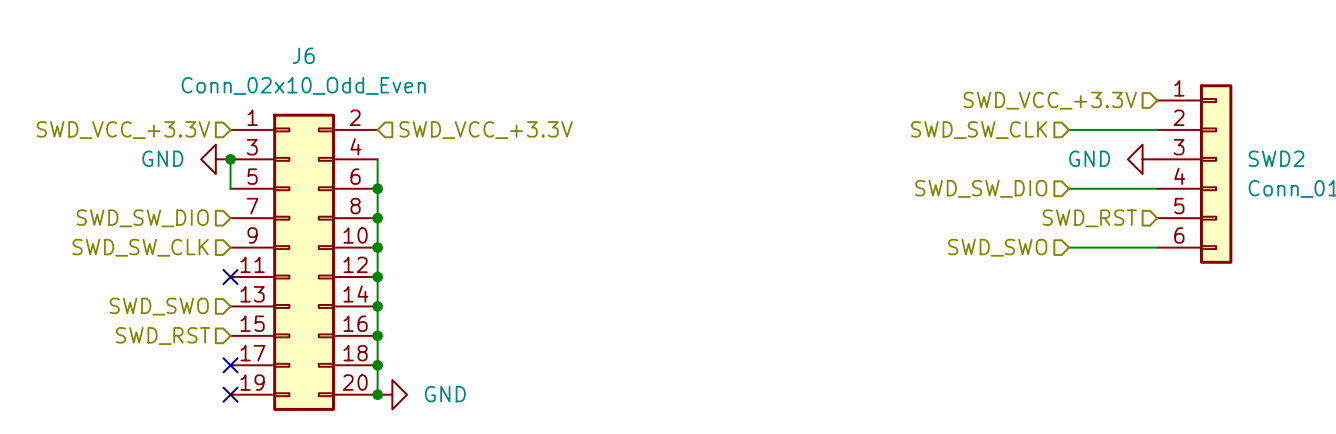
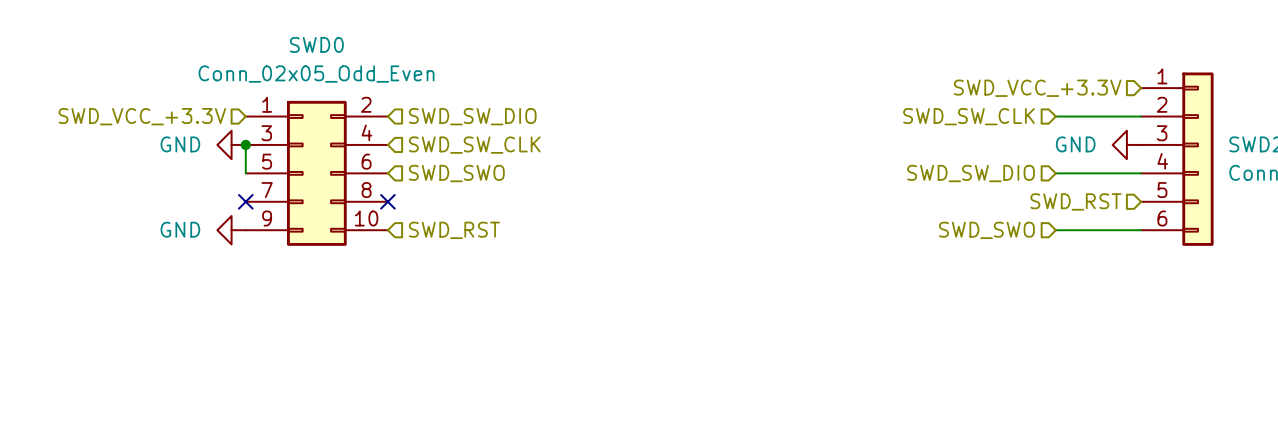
hierarchical label: SWD_VCC_+3.3V (486, 130) -> SWD_SW_DIO (472, 116)
wire: (377, 159) (377, 394) -> none
SWD0: none -> Conn_02x05_Odd_Even (316, 173)
junction: (377, 188) -> none
hierarchical label: SWD_SW_DIO (142, 218) -> none
junction: (377, 218) -> none
no-connect mark: none -> (387, 201)
hierarchical label rotation: 0° (140, 247) -> 180° (474, 145)
hierarchical label position: SWD_SW_CLK (140, 247) -> SWD_SW_CLK (474, 145)
junction: (377, 247) -> none
J6: Conn_02x10_Odd_Even (304, 262) -> none
no-connect mark position: (230, 277) -> (245, 201)
junction: (377, 277) -> none
hierarchical label rotation: 0° (159, 306) -> 180° (456, 173)
hierarchical label position: SWD_SWO (159, 306) -> SWD_SWO (456, 173)
junction: (377, 306) -> none
junction: (377, 335) -> none
hierarchical label rotation: 0° (163, 336) -> 180° (454, 230)
hierarchical label position: SWD_RST (163, 336) -> SWD_RST (454, 230)
no-connect mark: (230, 365) -> none
junction: (377, 365) -> none
no-connect mark: (230, 394) -> none
junction: (377, 394) -> none
power symbol rotation: 0° (392, 394) -> 180° (231, 230)
power symbol position: GND (392, 394) -> GND (231, 230)

